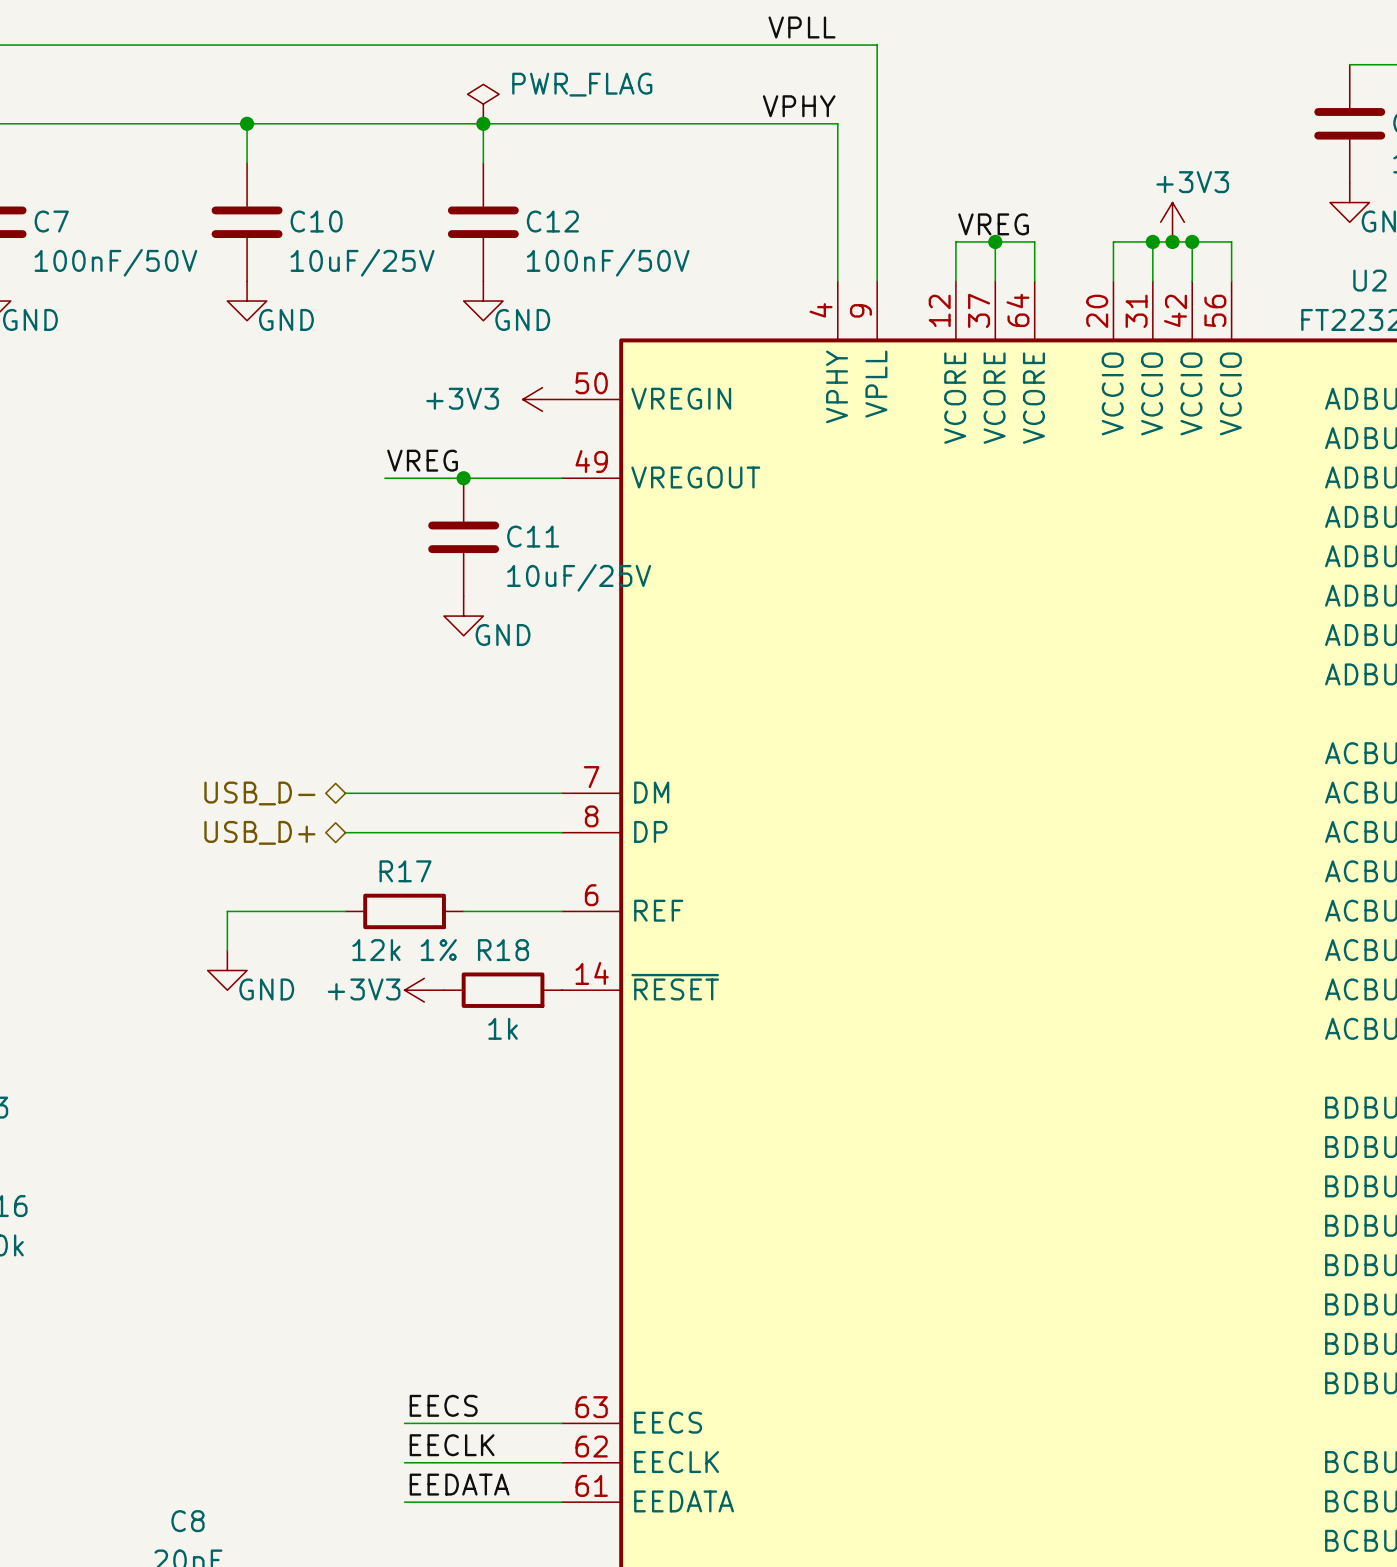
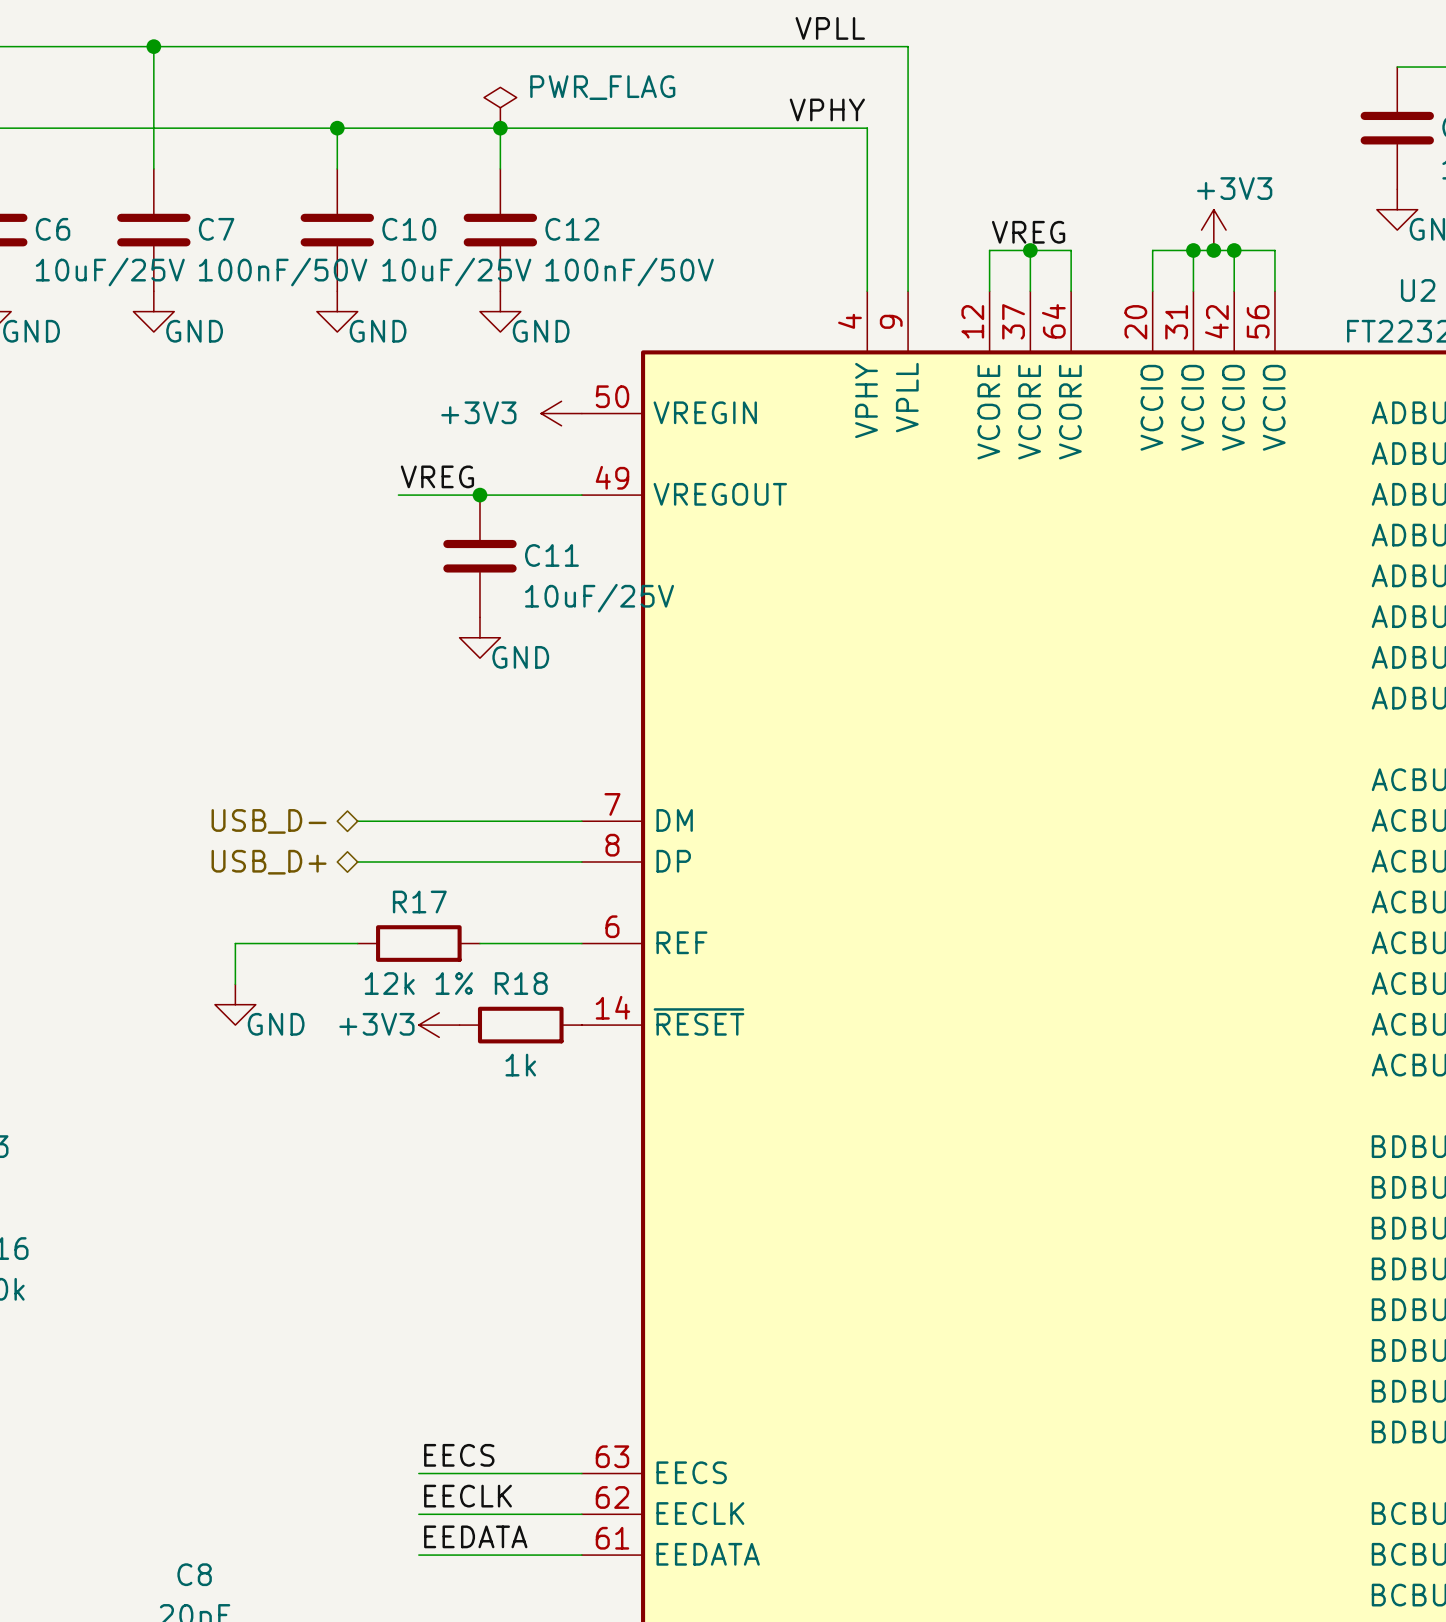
wire: none -> (153, 46) (153, 168)
junction: none -> (153, 46)
wire: (247, 123) (247, 163) -> (337, 128) (337, 168)
junction: (247, 123) -> none
junction: none -> (337, 128)
C7 name: C7 (51, 221) -> C6 (53, 229)
C7: none -> 100nF/50V (153, 230)
C10 position: (247, 222) -> (337, 230)
C7 value: 100nF/50V (115, 262) -> 10uF/25V (110, 272)
power symbol: none -> GND (153, 311)
power symbol: GND (247, 301) -> none
power symbol: none -> GND (337, 311)

